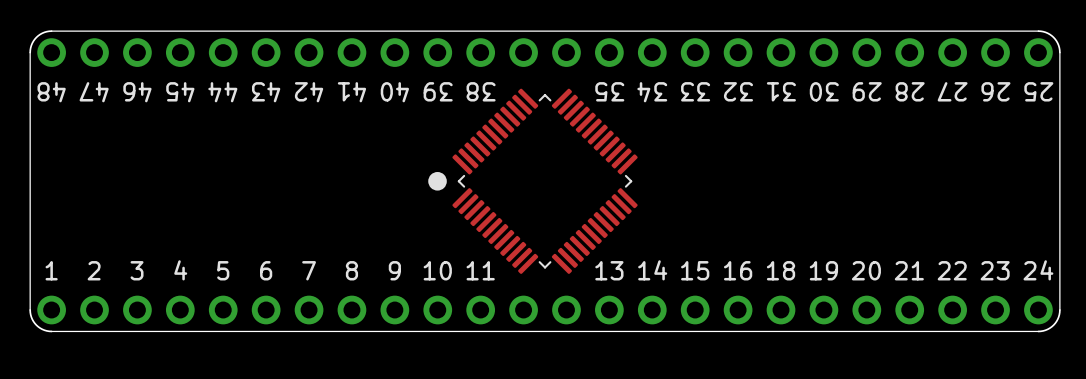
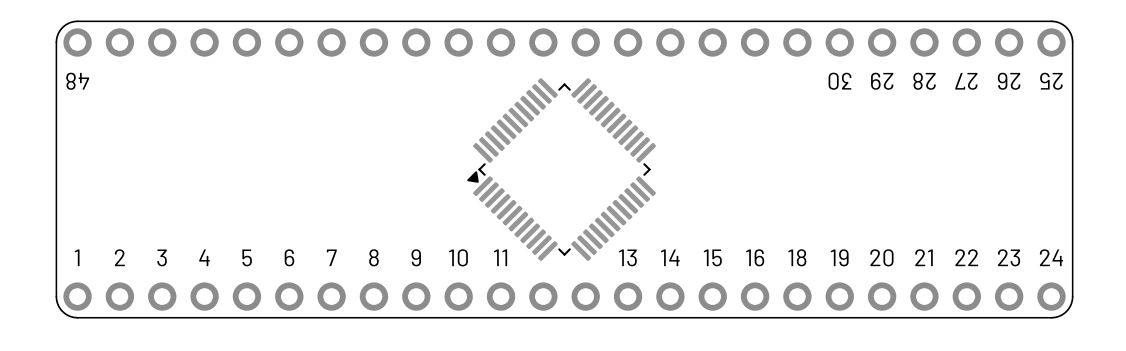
part footprint: [428, 88, 638, 274] -> [467, 78, 656, 261]
text: 39 (438, 91) -> none
text: 38 (481, 91) -> none
text: 35 (609, 91) -> none
text: 33 (695, 91) -> none
text: 32 (738, 91) -> none
text: 31 (781, 91) -> none
text: 47 (94, 92) -> none
text: 46 (137, 92) -> none
text: 45 (180, 92) -> none
text: 44 (222, 92) -> none
text: 43 (266, 92) -> none
text: 42 (309, 92) -> none
text: 41 (351, 92) -> none
text: 40 (394, 92) -> none
text: 34 (652, 92) -> none

